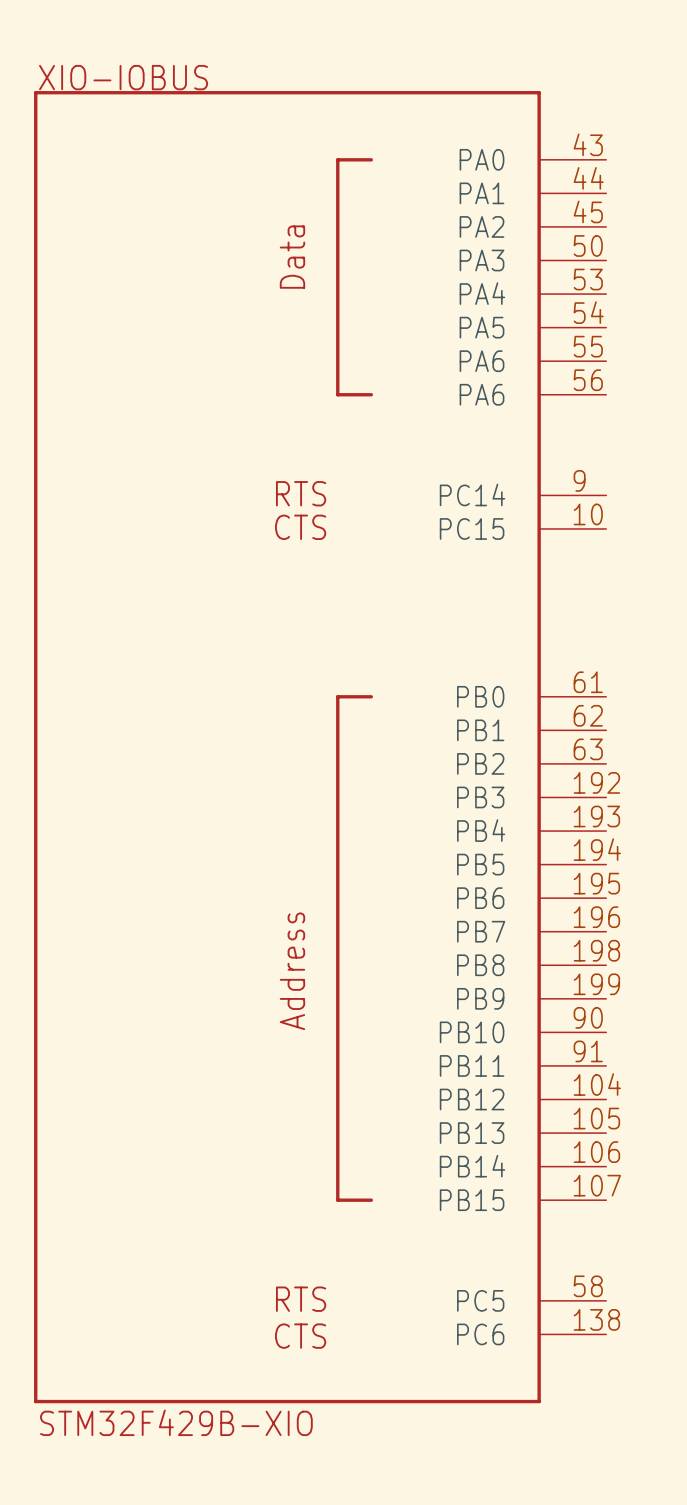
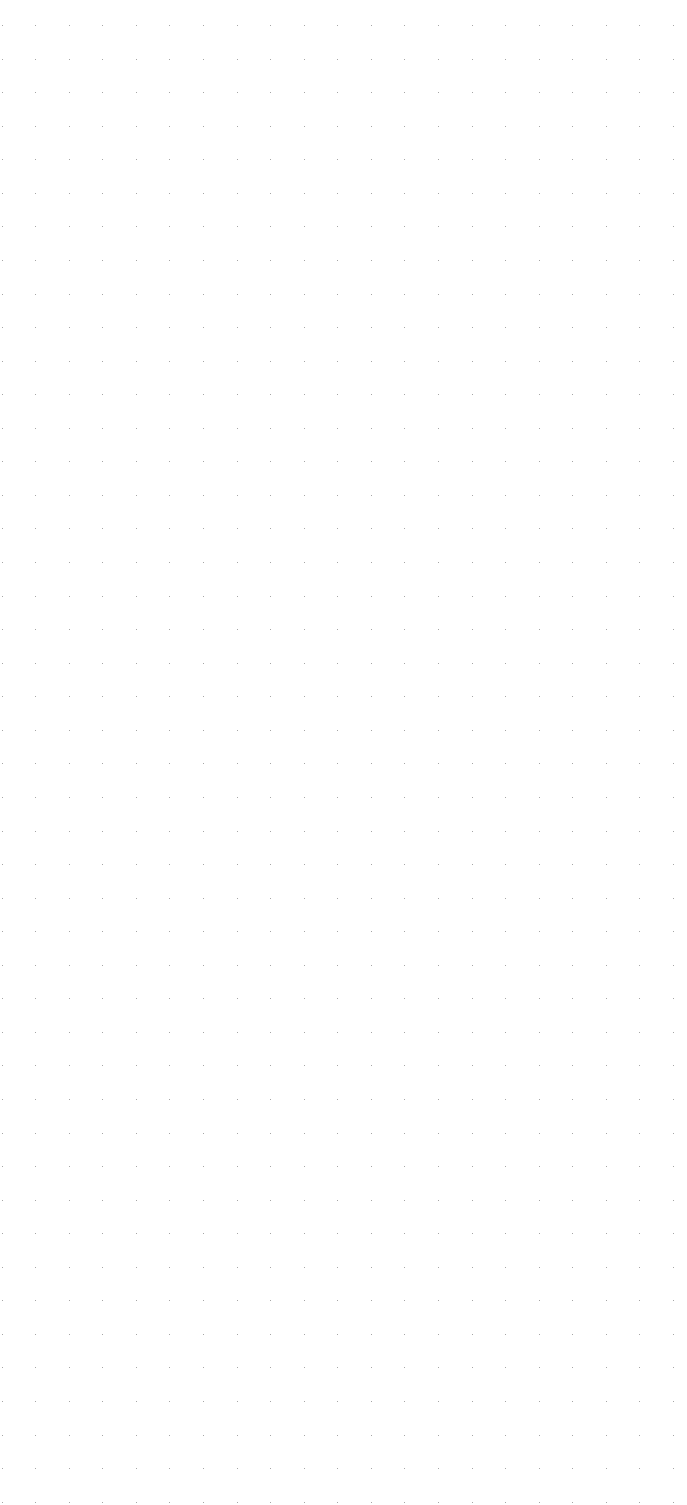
XIO-IOBUS: STM32F429B-XIO (320, 747) -> none

